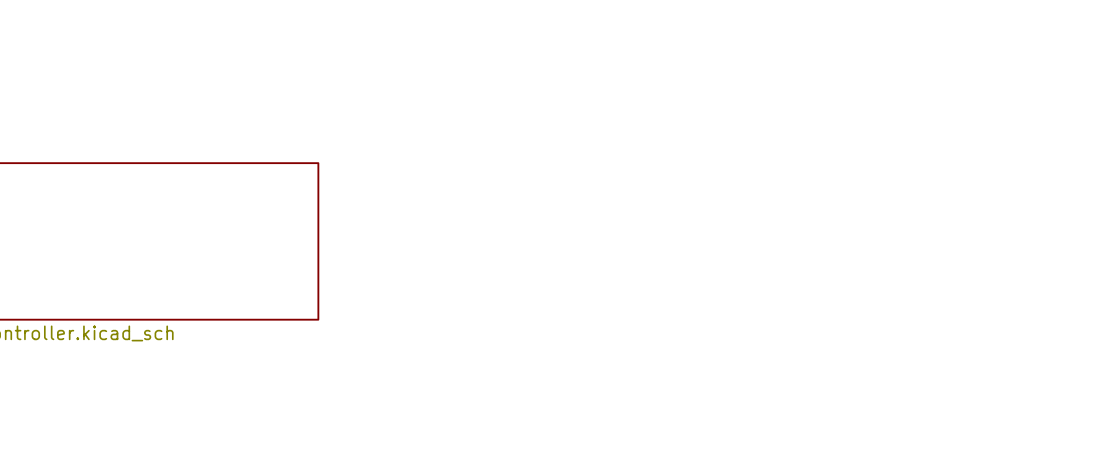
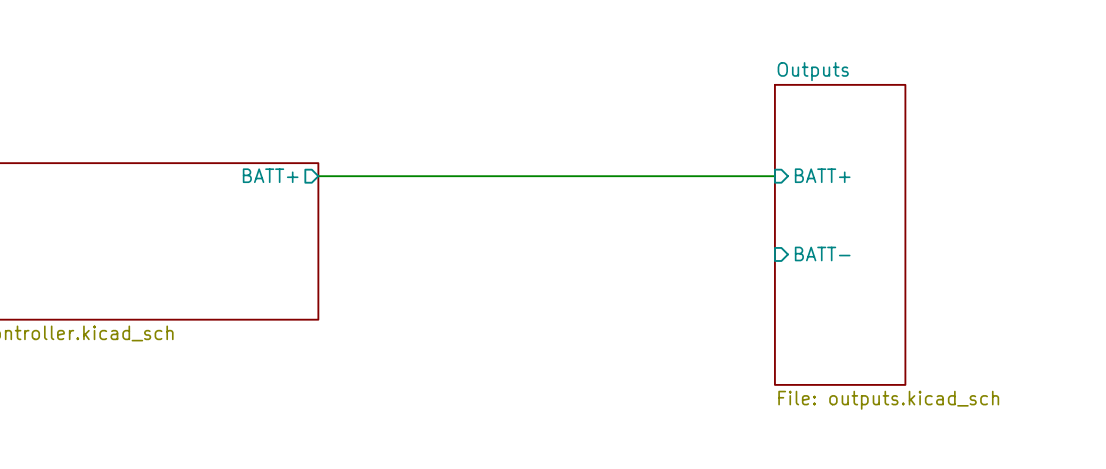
sheet pin: none -> BATT+ (270, 175)
sheet pin: none -> BATT+ (822, 175)
wire: none -> (318, 176) (774, 176)
sheet Outputs: none -> File: outputs.kicad_sch (840, 234)
sheet pin: none -> BATT- (822, 253)

